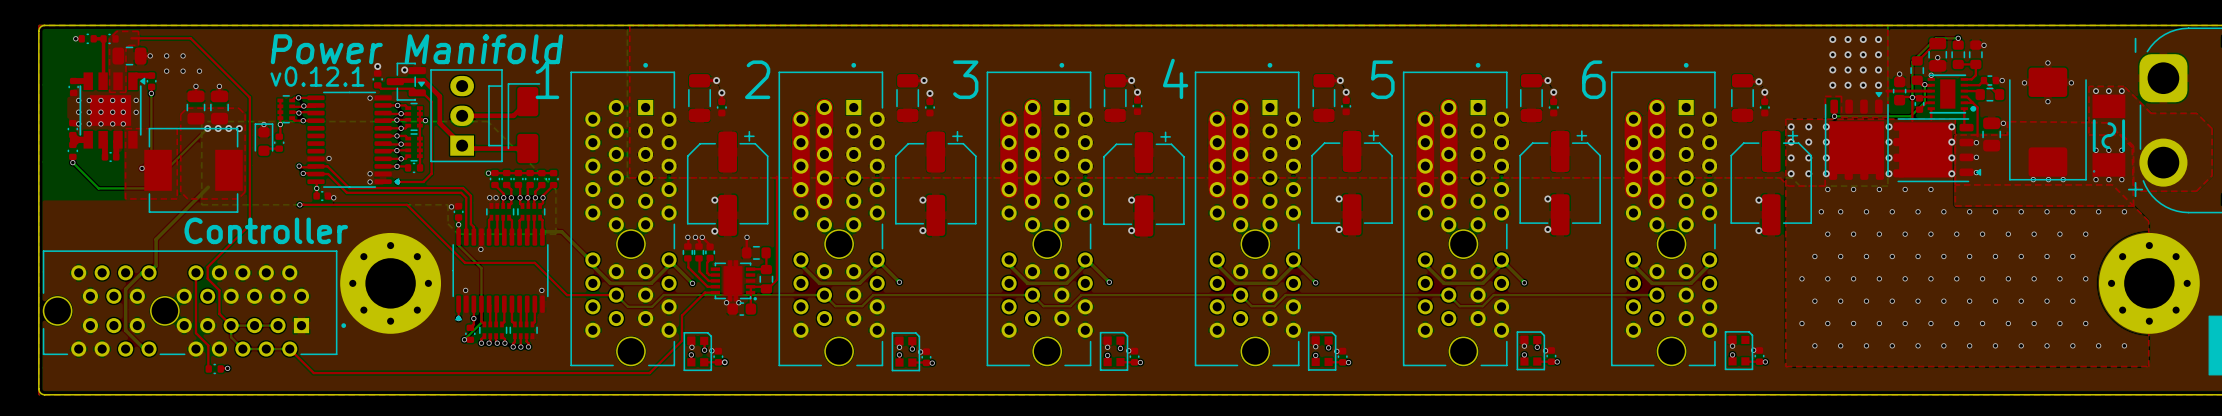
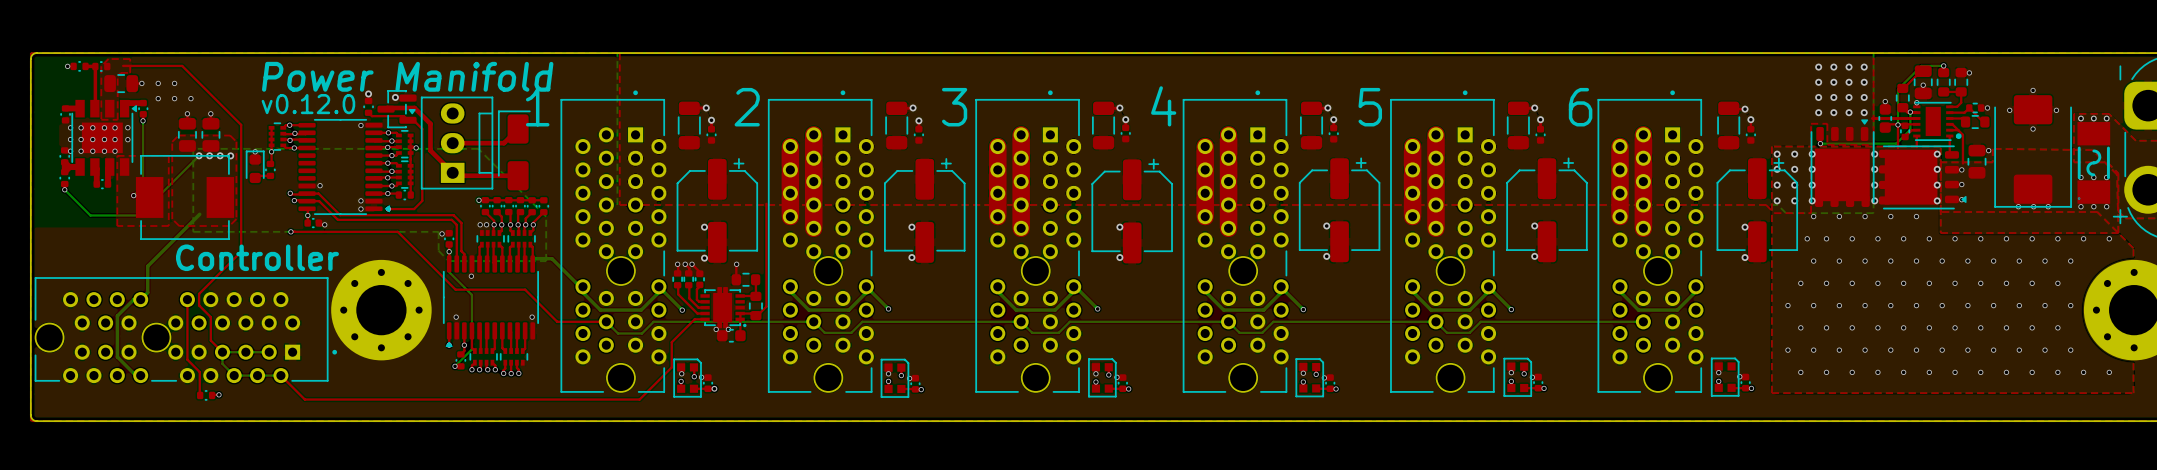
text: v0.12.1 (317, 76) -> v0.12.0 (308, 104)

